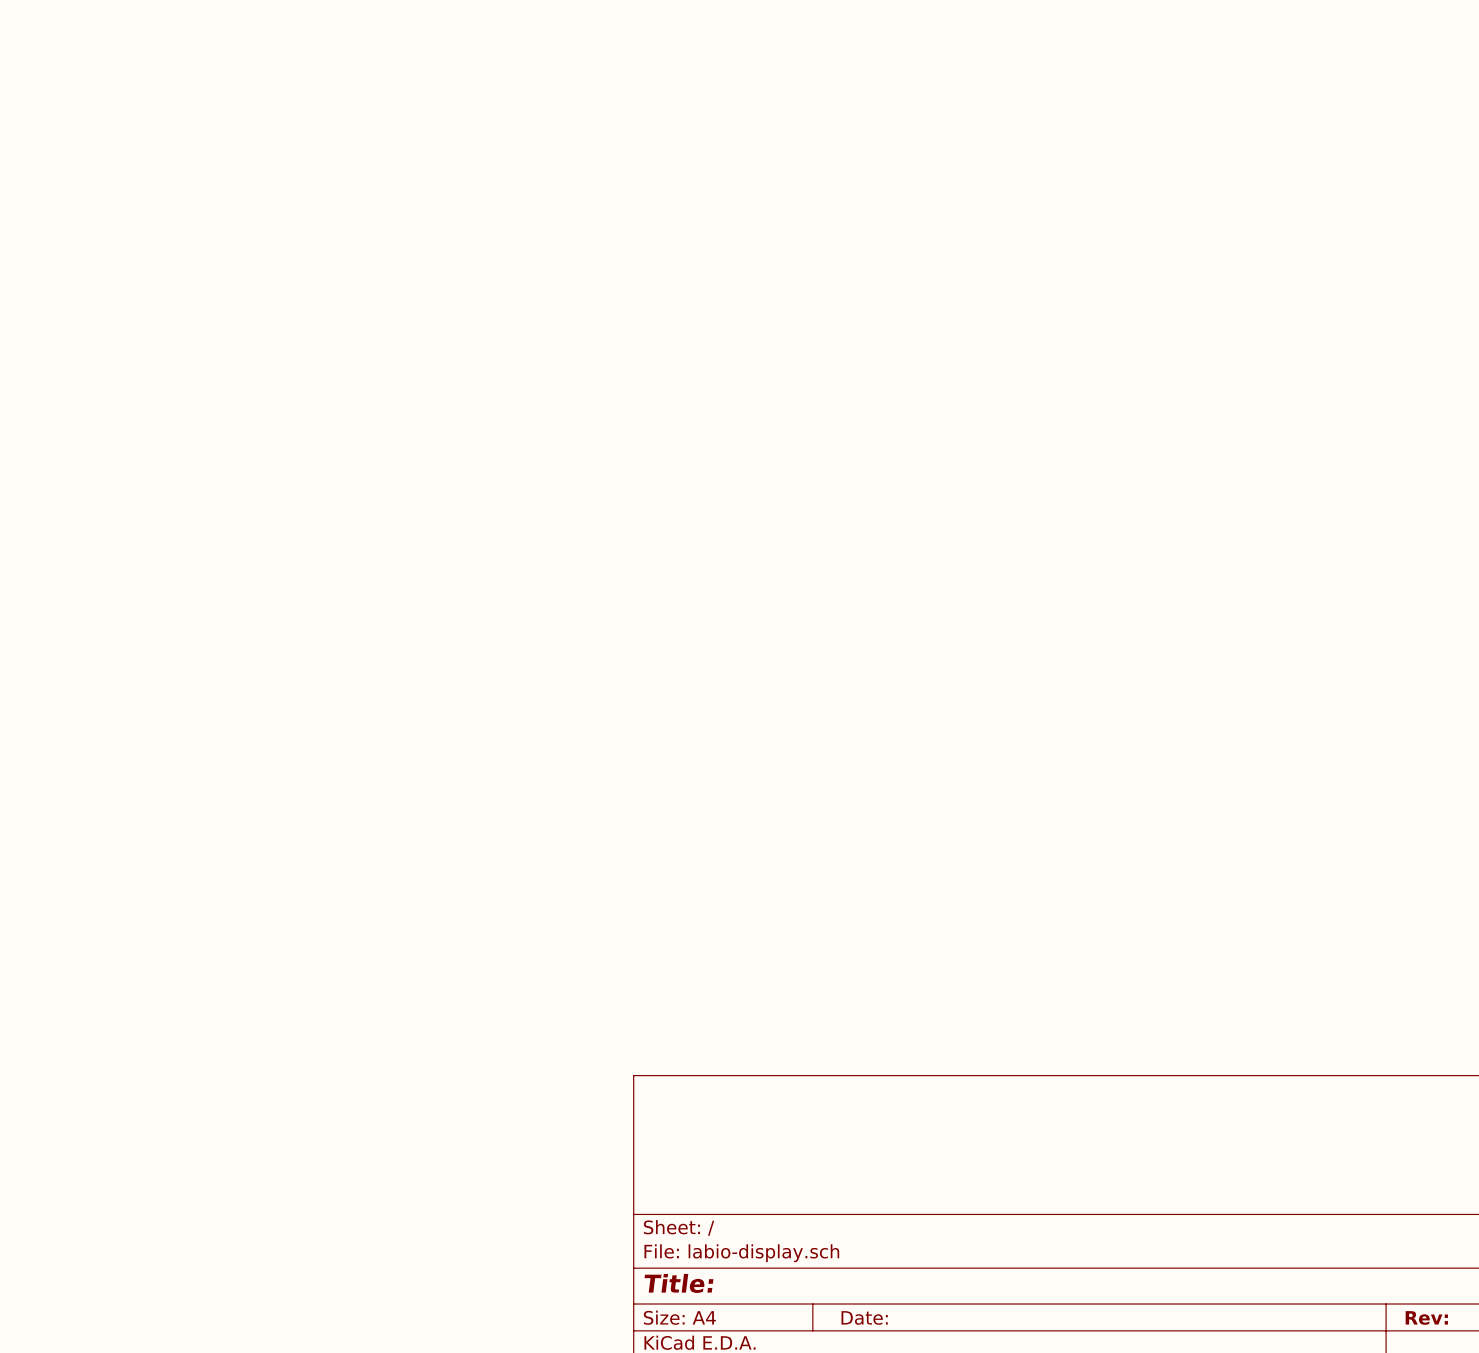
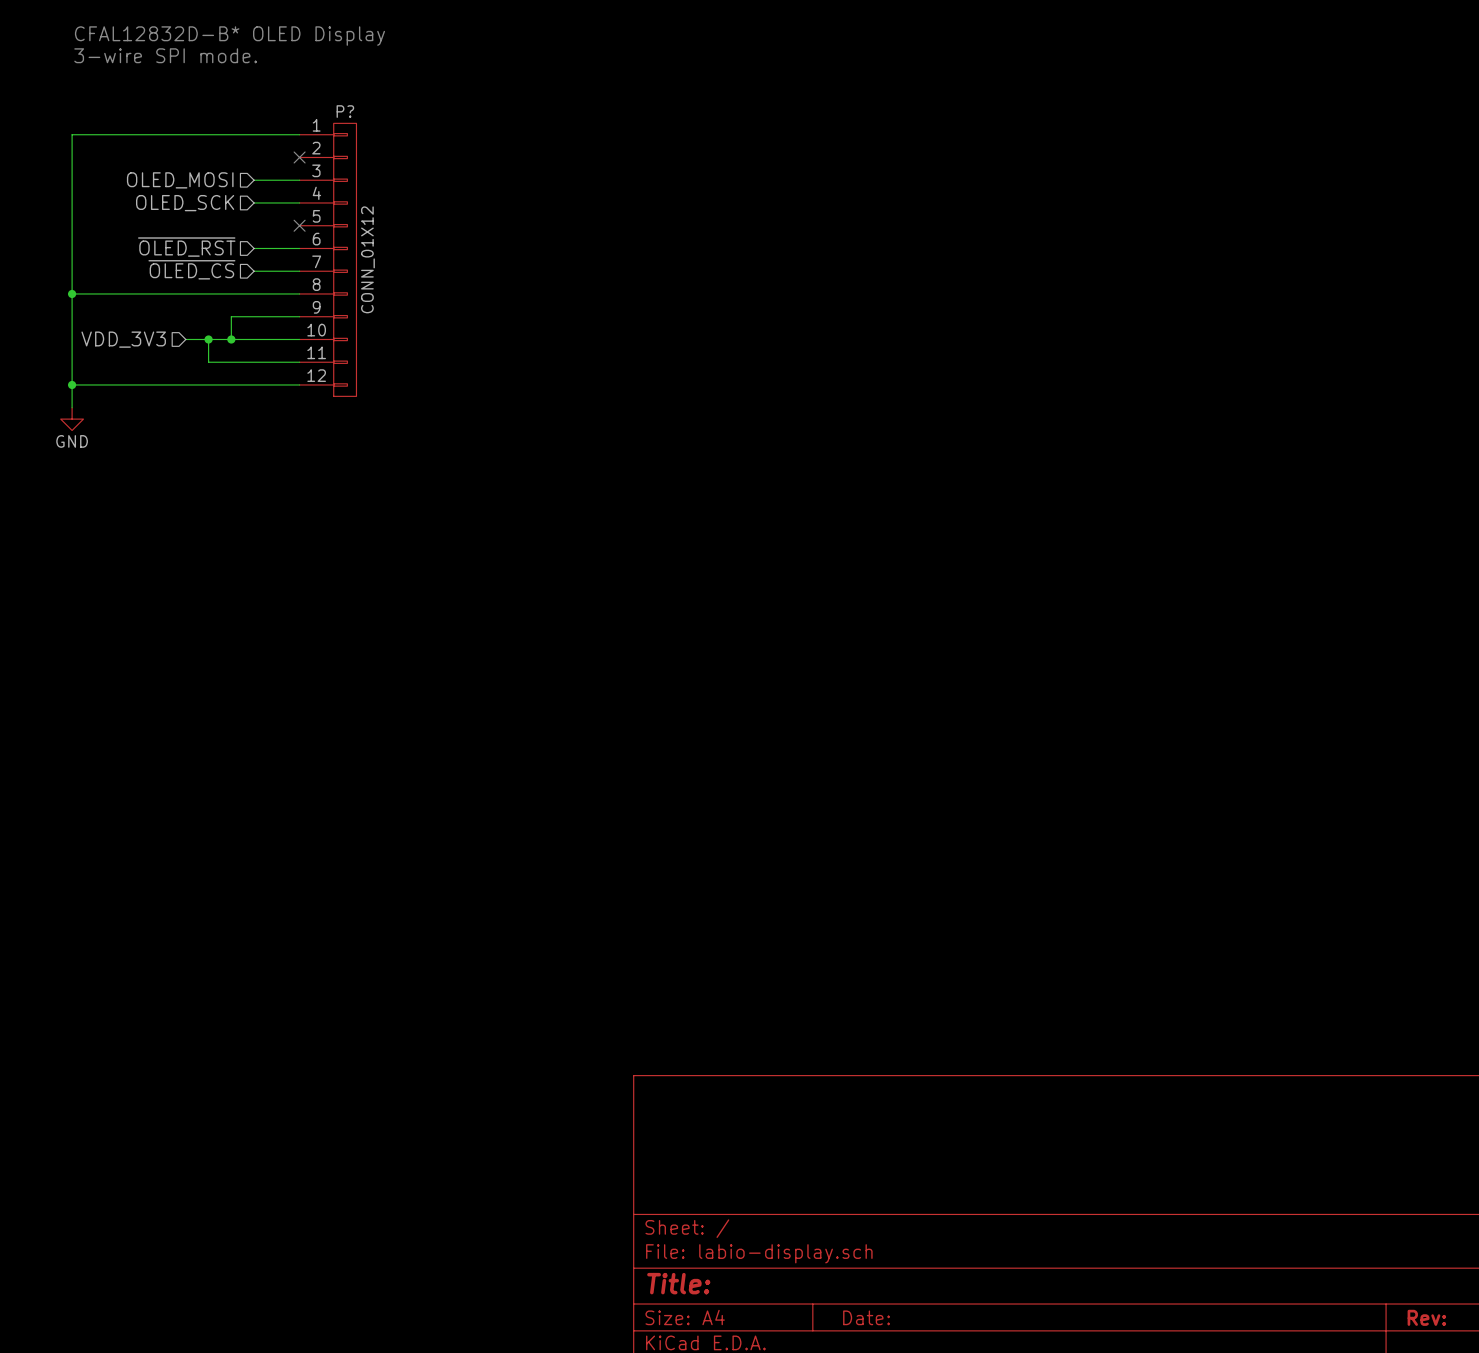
text: none -> CFAL12832D-B* OLED Display (229, 36)
text: none -> 3-wire SPI mode. (165, 55)
wire: none -> (299, 134) (72, 134) (72, 407)
no-connect mark: none -> (299, 157)
wire: none -> (254, 180) (299, 180)
hierarchical label: none -> OLED_MOSI (180, 180)
wire: none -> (254, 202) (299, 202)
hierarchical label: none -> OLED_SCK (185, 203)
no-connect mark: none -> (299, 225)
hierarchical label: none -> ~{OLED_RST} (186, 247)
wire: none -> (254, 248) (299, 248)
P?: none -> CONN_01X12 (328, 259)
hierarchical label: none -> ~{OLED_CS} (191, 269)
wire: none -> (254, 271) (299, 271)
wire: none -> (72, 293) (299, 293)
junction: none -> (72, 293)
wire: none -> (299, 316) (231, 316) (231, 339)
wire: none -> (185, 339) (299, 339)
wire: none -> (208, 339) (208, 362) (299, 362)
junction: none -> (208, 339)
junction: none -> (231, 339)
hierarchical label: none -> VDD_3V3 (123, 339)
wire: none -> (72, 384) (299, 384)
junction: none -> (72, 384)
power symbol: none -> GND (72, 419)

